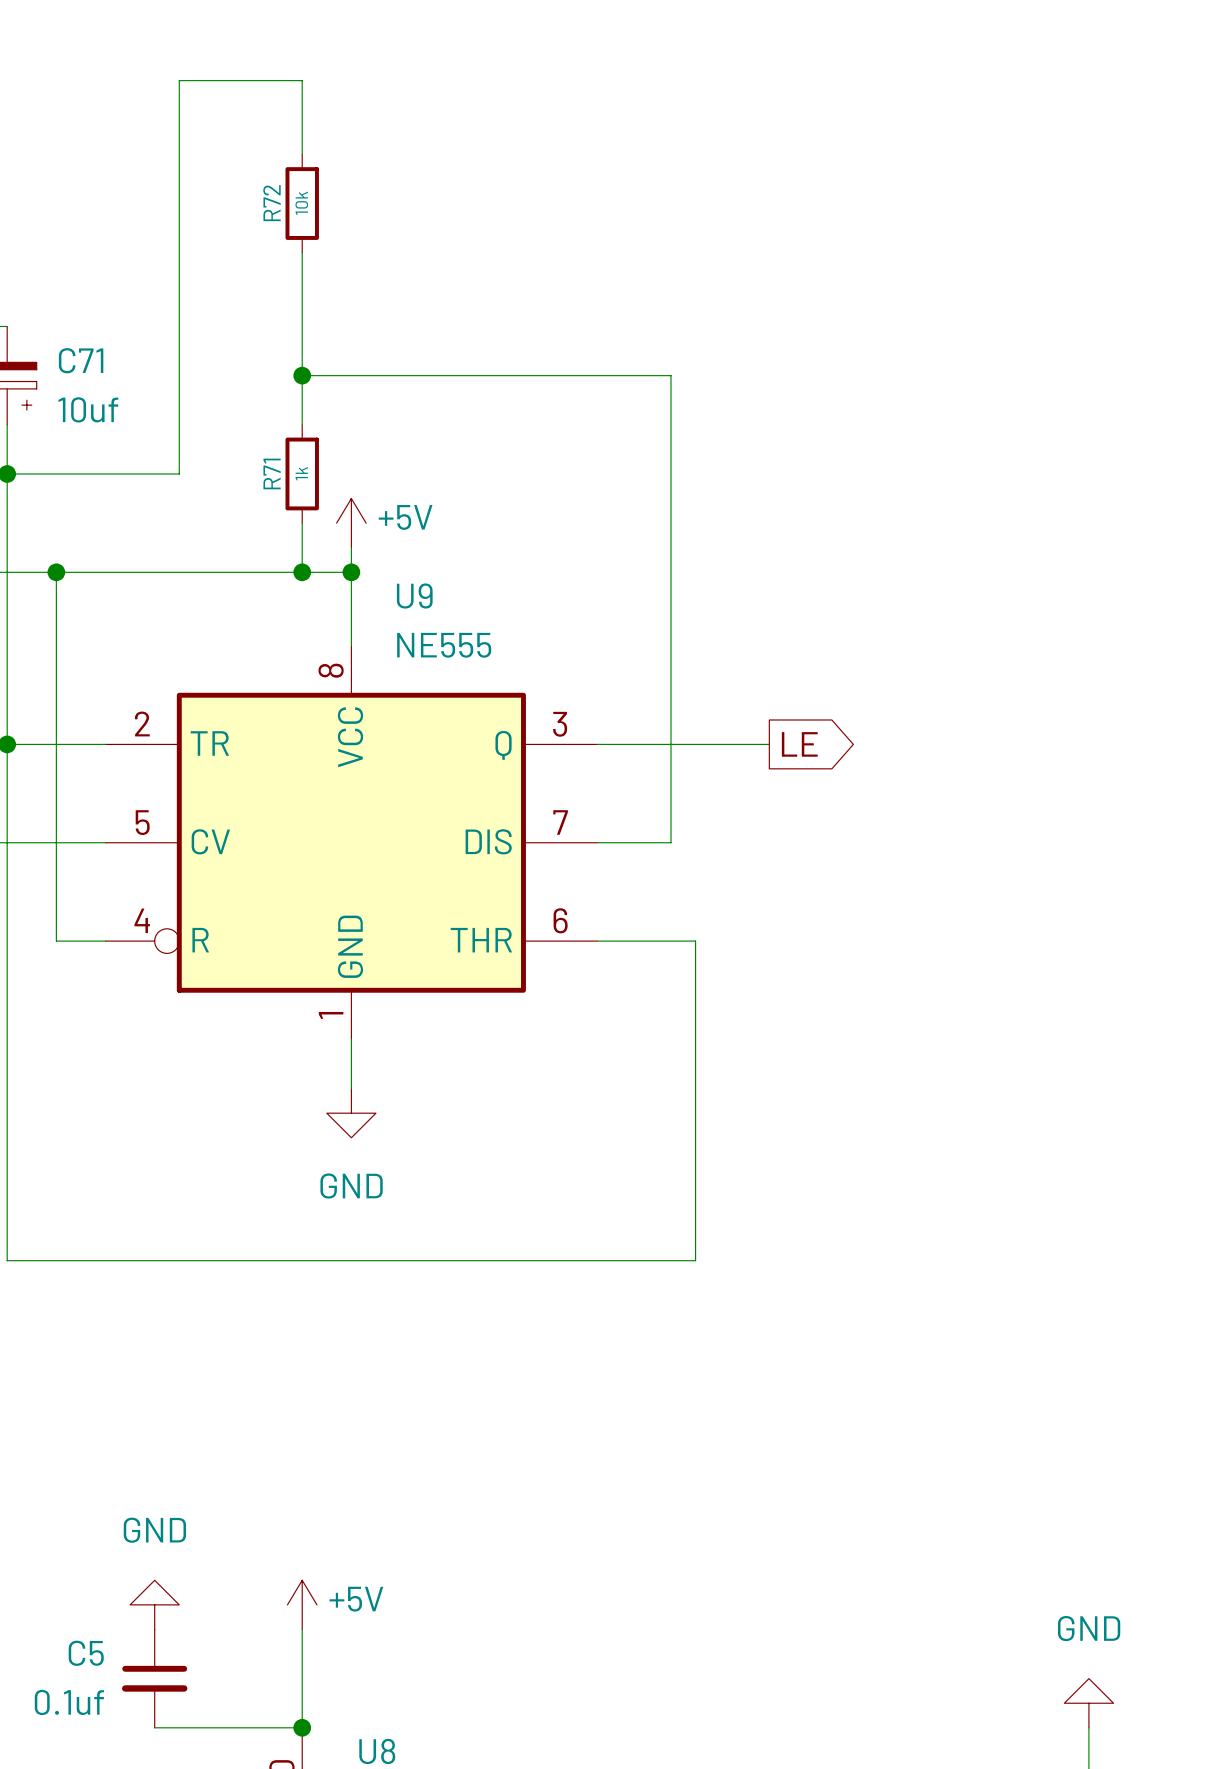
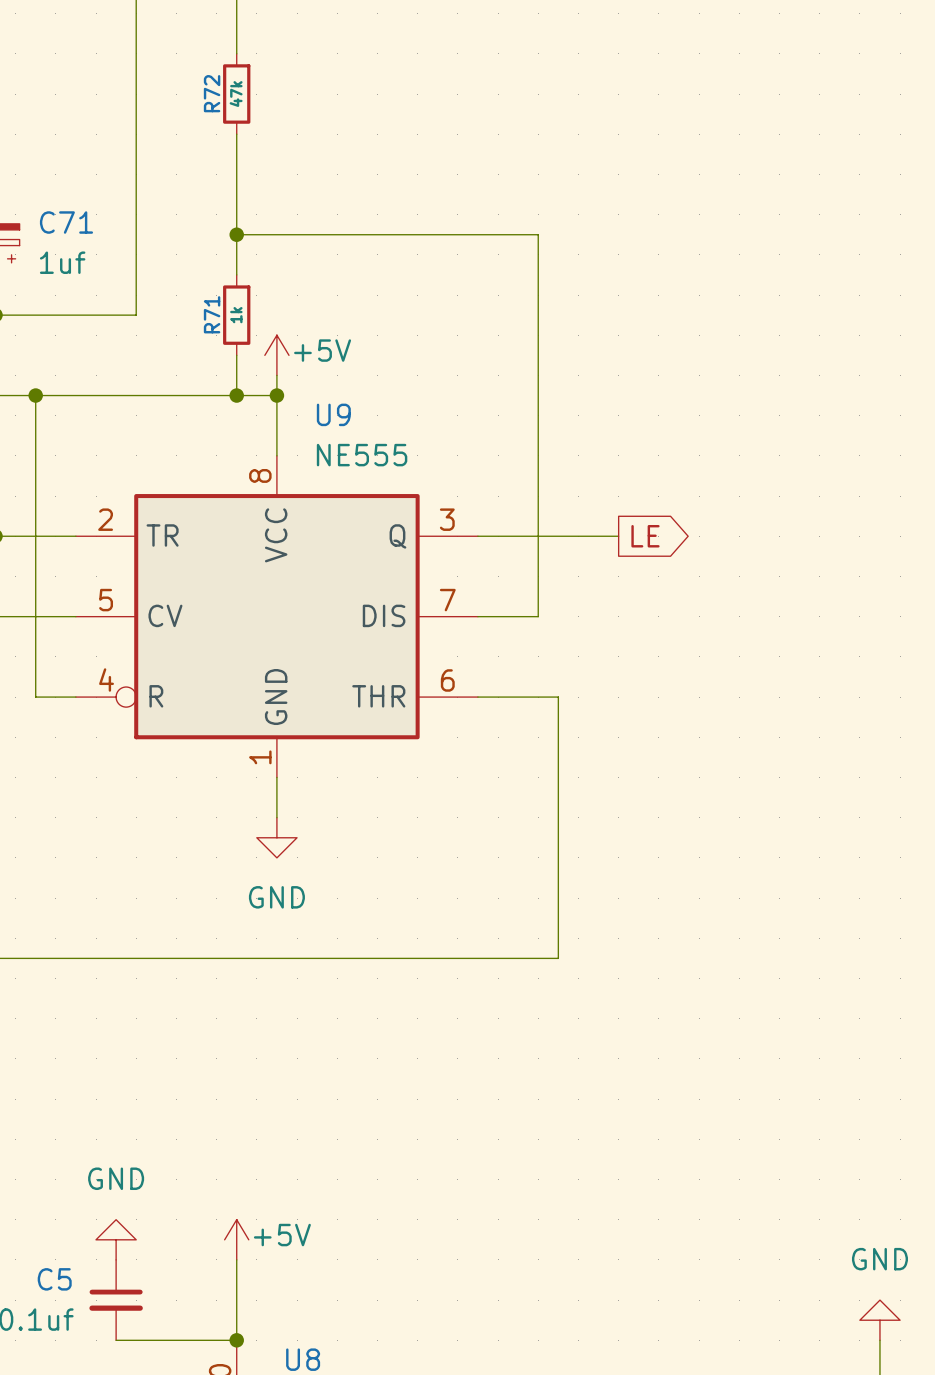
R72 value: 10k (301, 203) -> 47k (236, 94)
C71 value: 10uf (88, 409) -> 1uf (62, 262)

